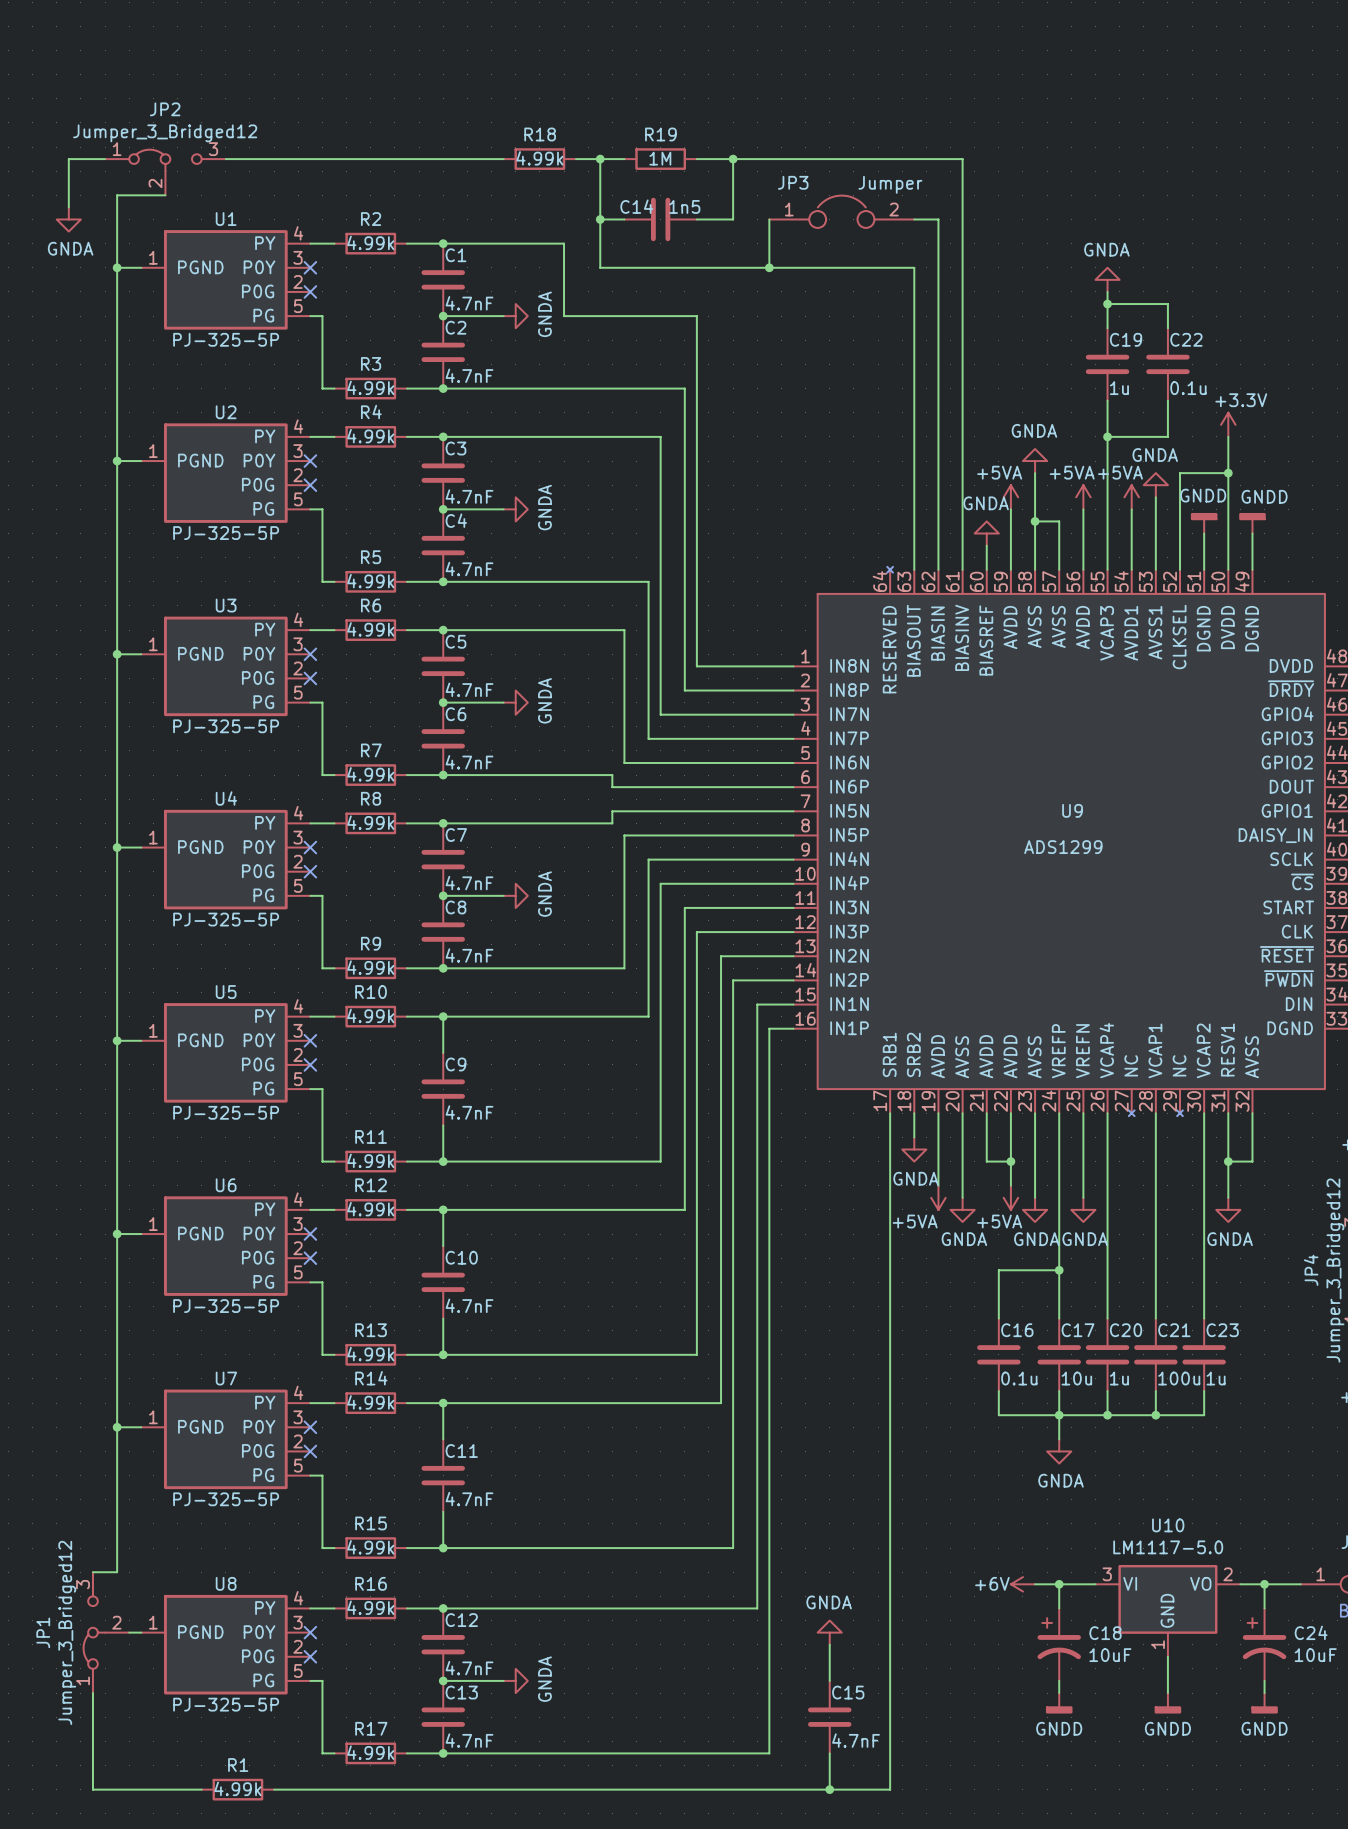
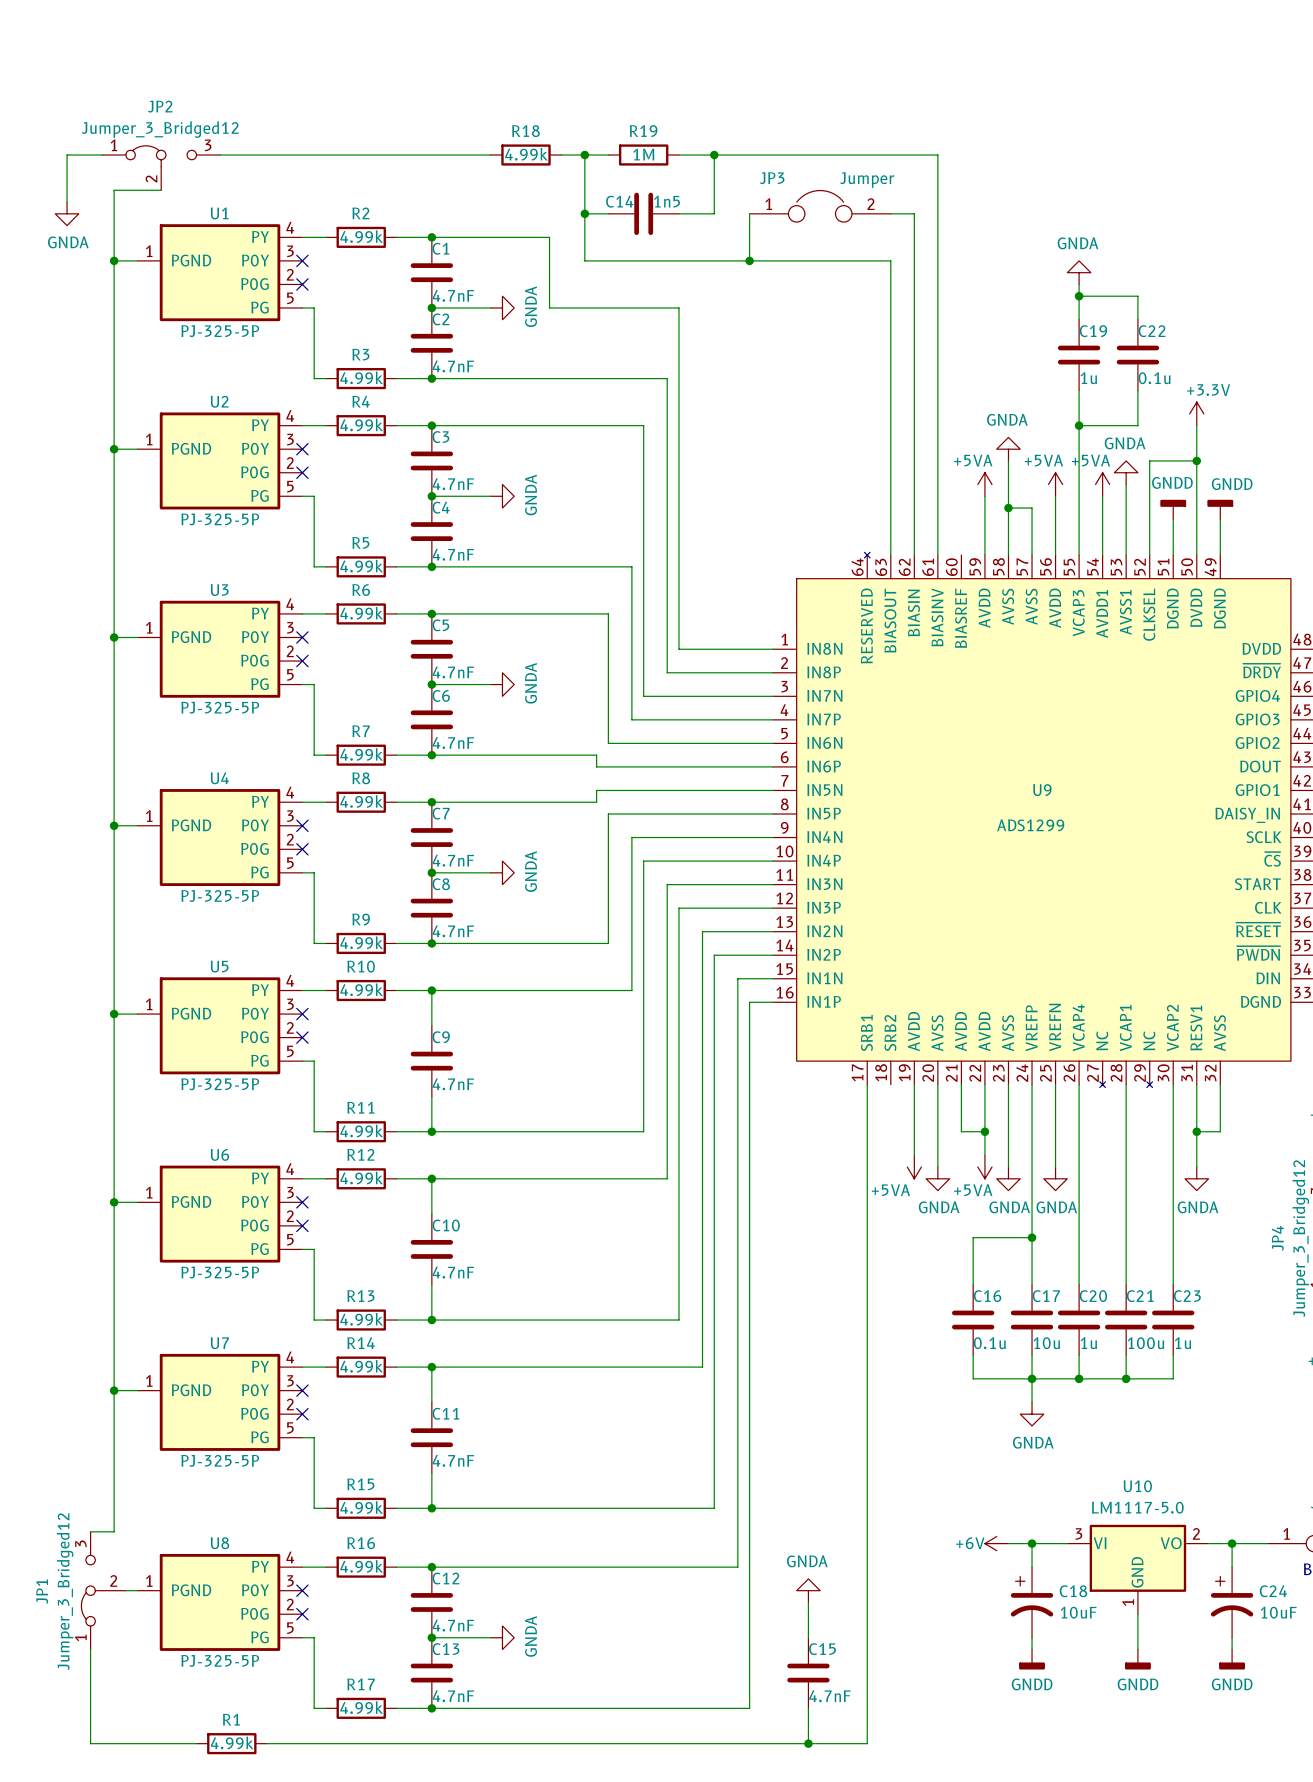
power symbol: GNDA (986, 533) -> none
wire: (986, 545) (986, 569) -> none
wire: (914, 1113) (914, 1137) -> none
power symbol: GNDA (914, 1149) -> none

